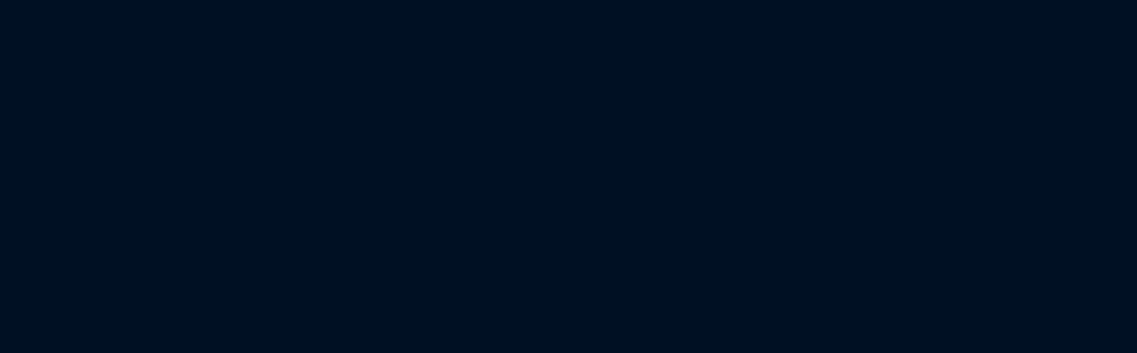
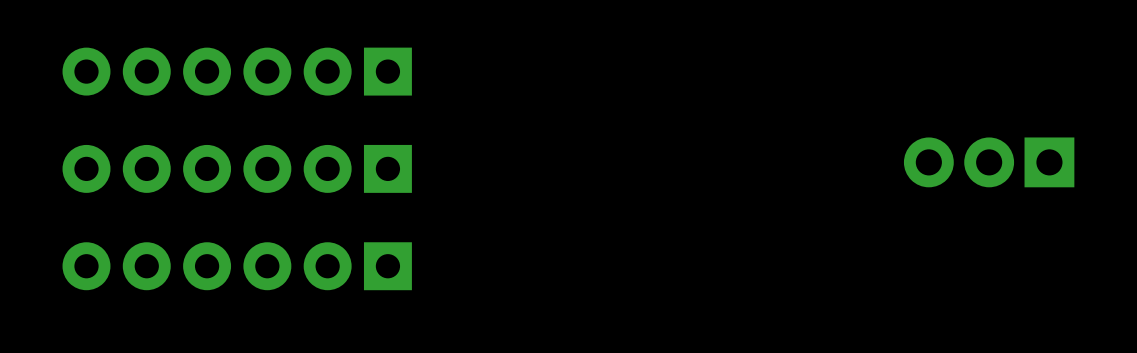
part: none -> (237, 71)
part: none -> (989, 162)
part: none -> (237, 168)
part: none -> (237, 266)

